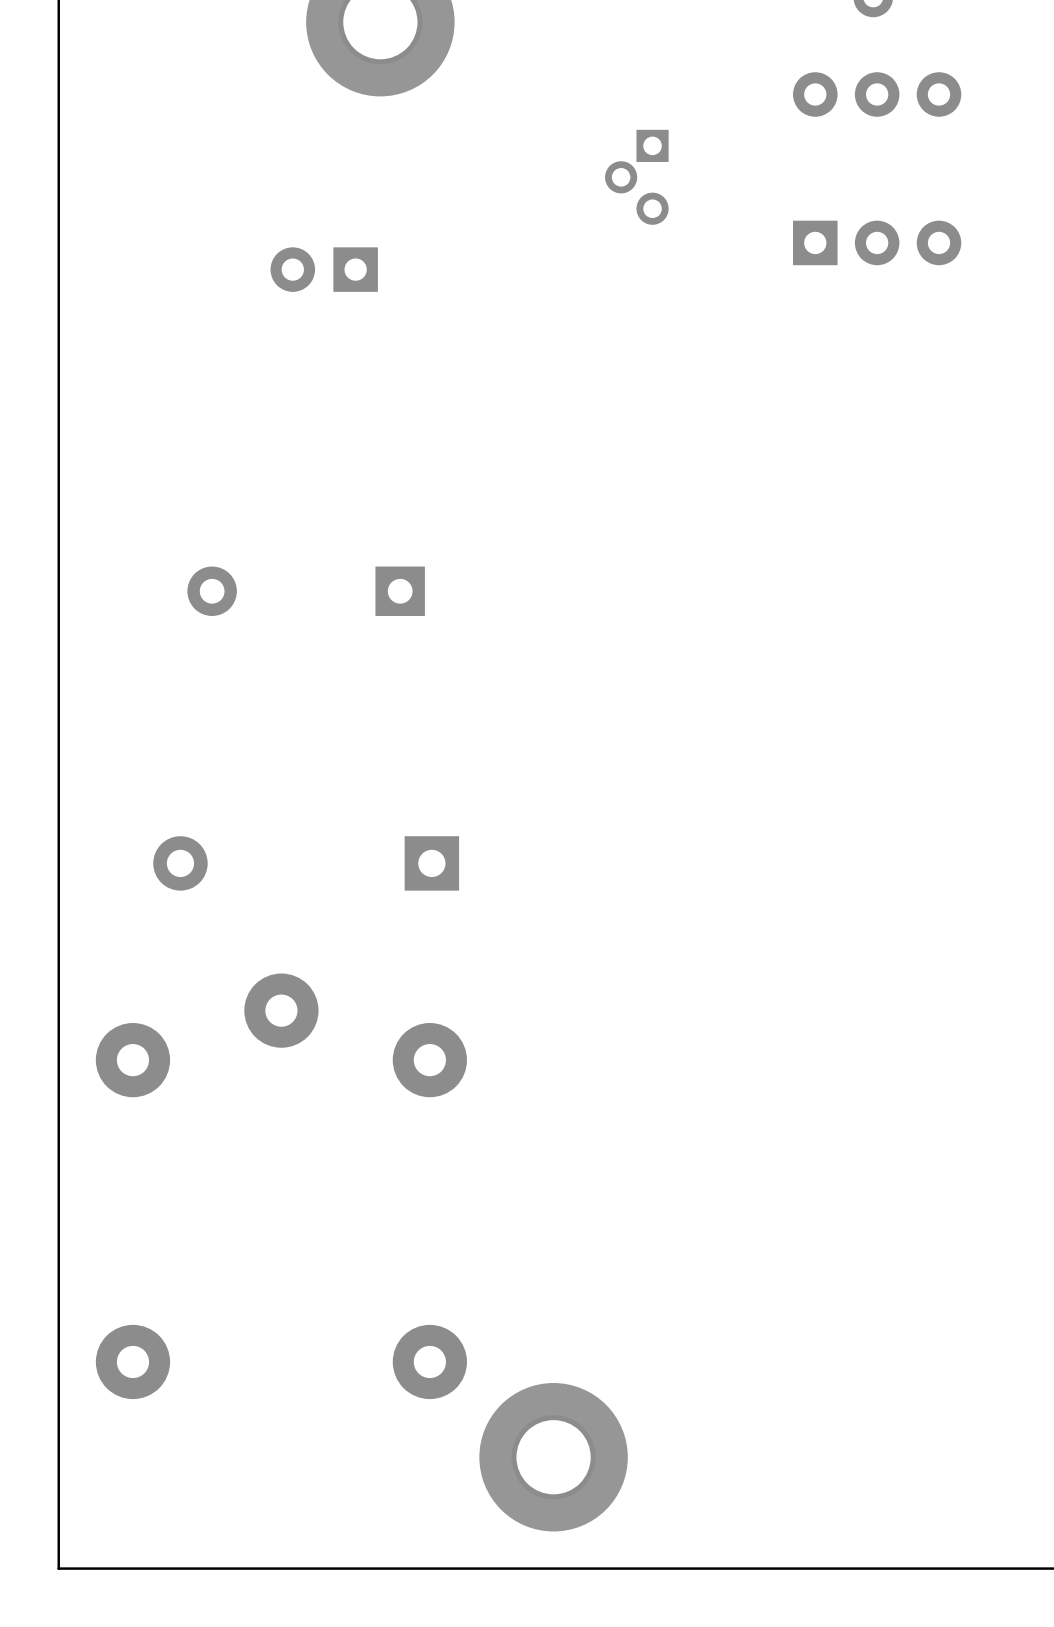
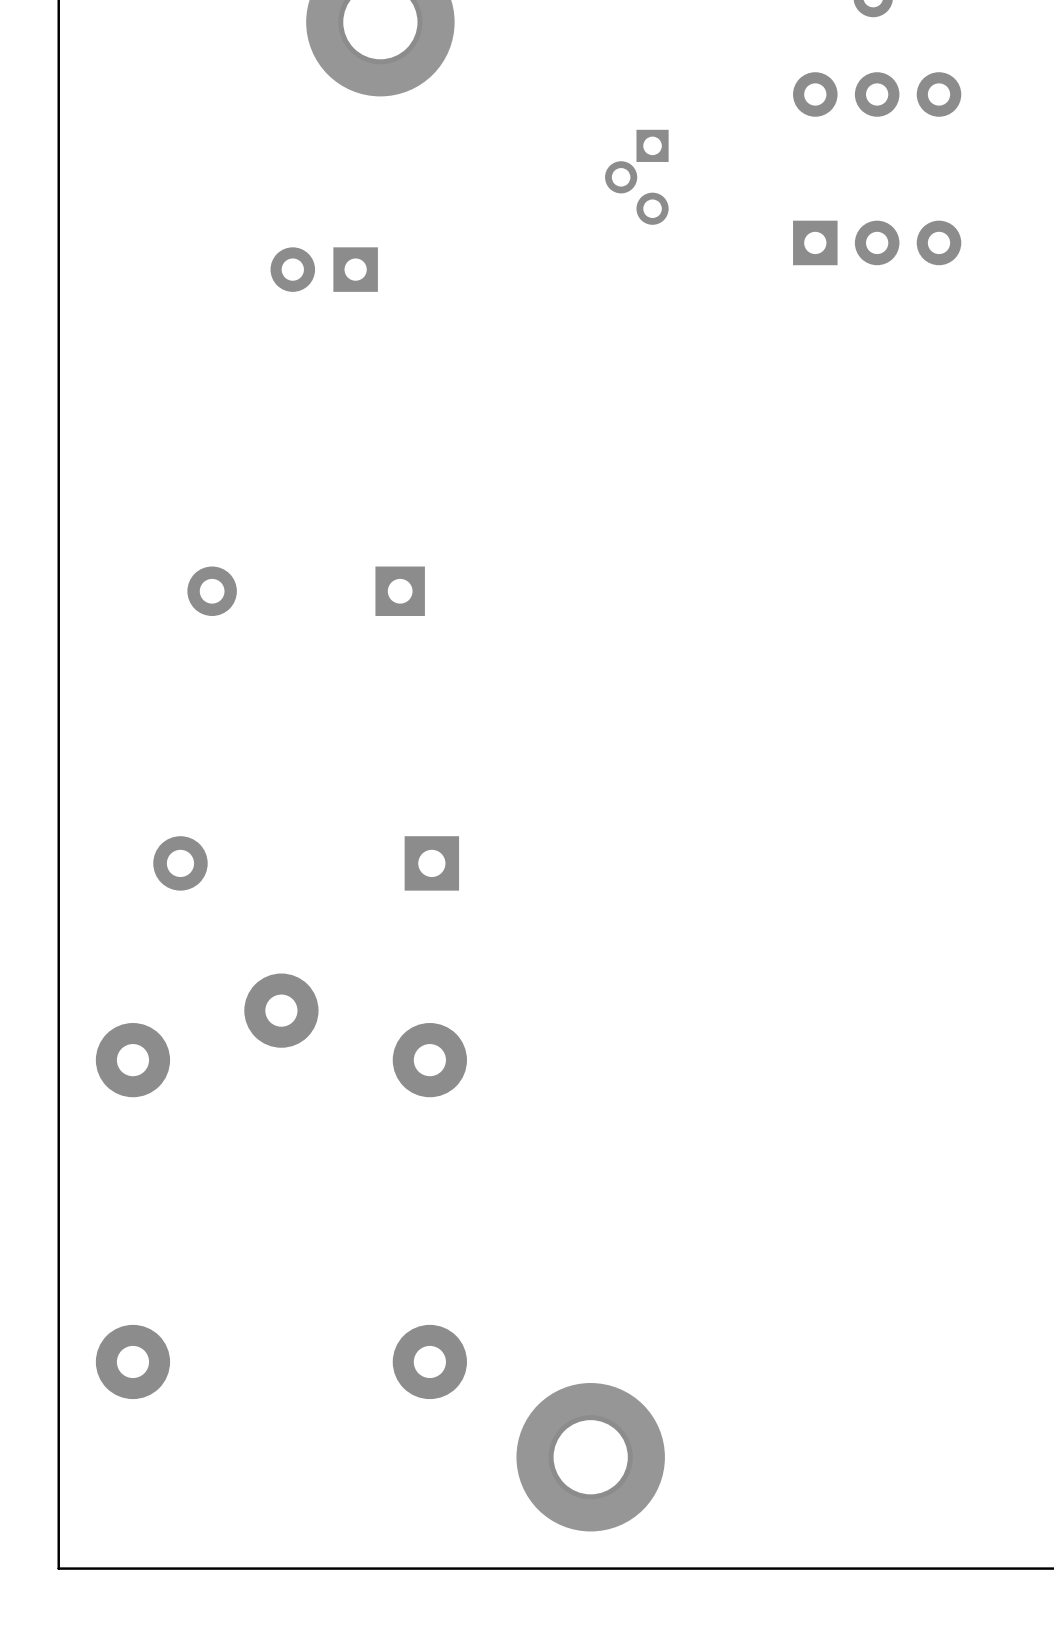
part position: (553, 1457) -> (590, 1457)

